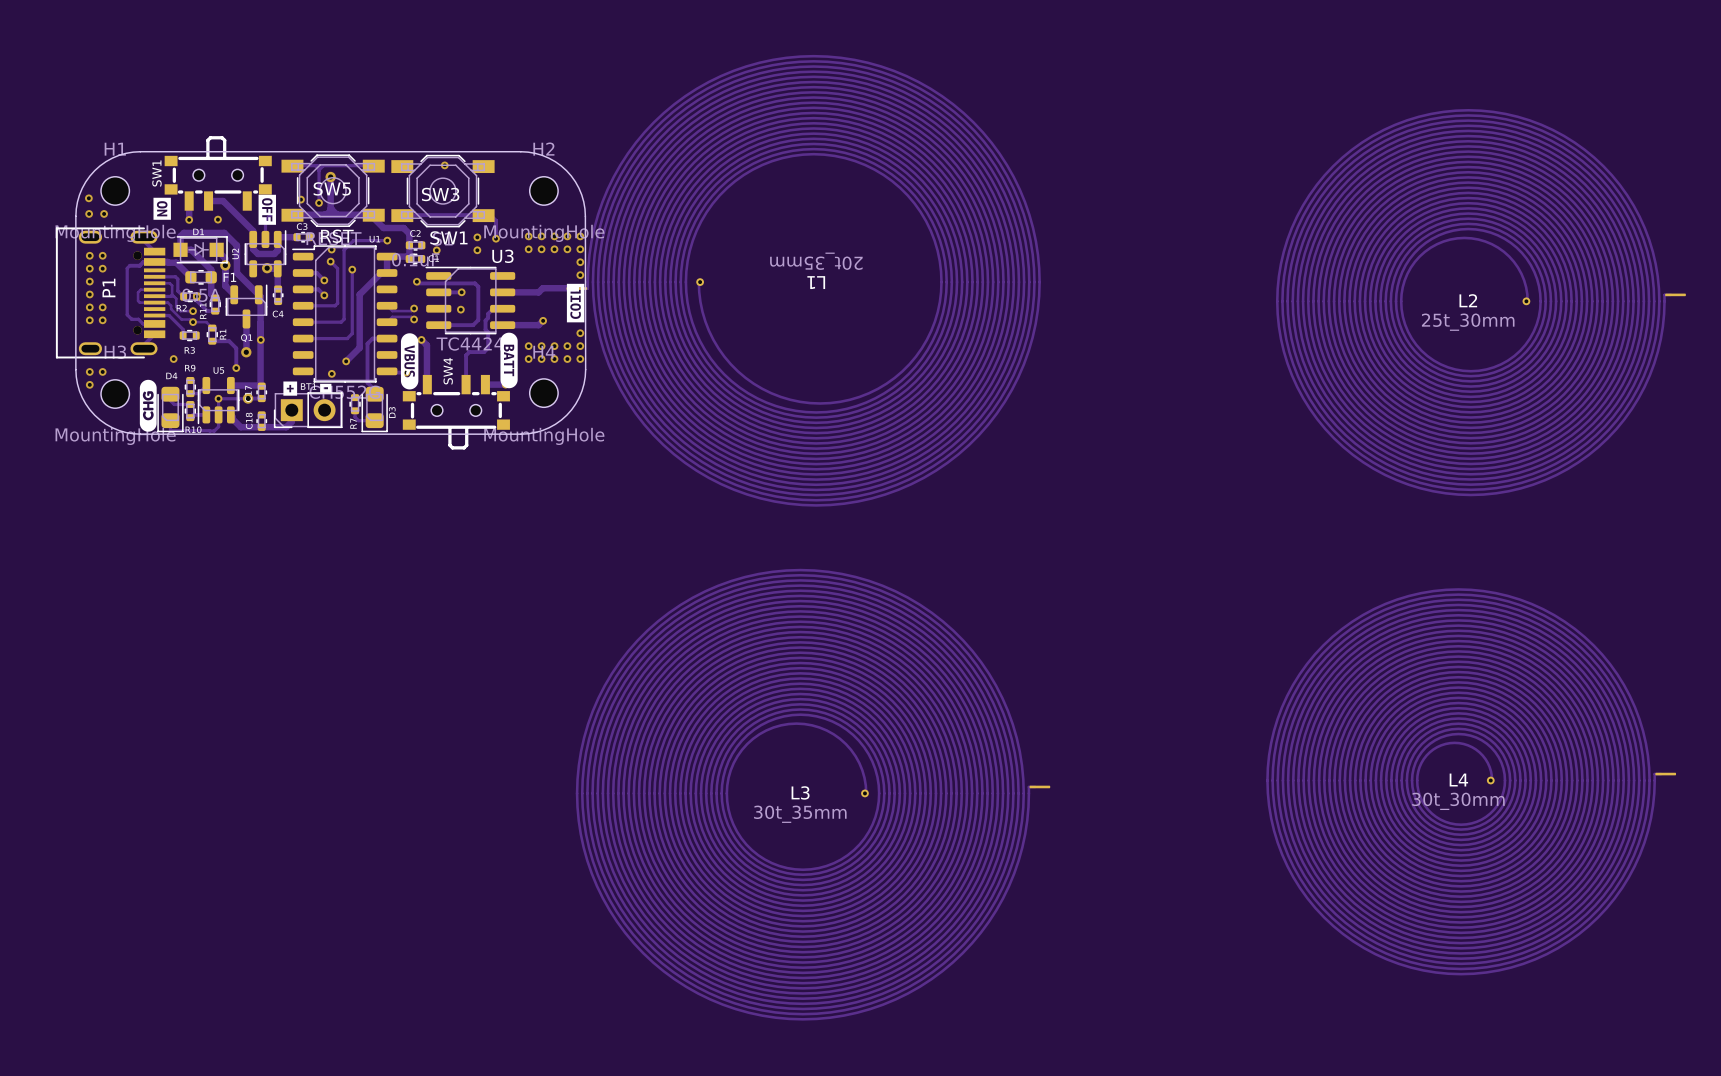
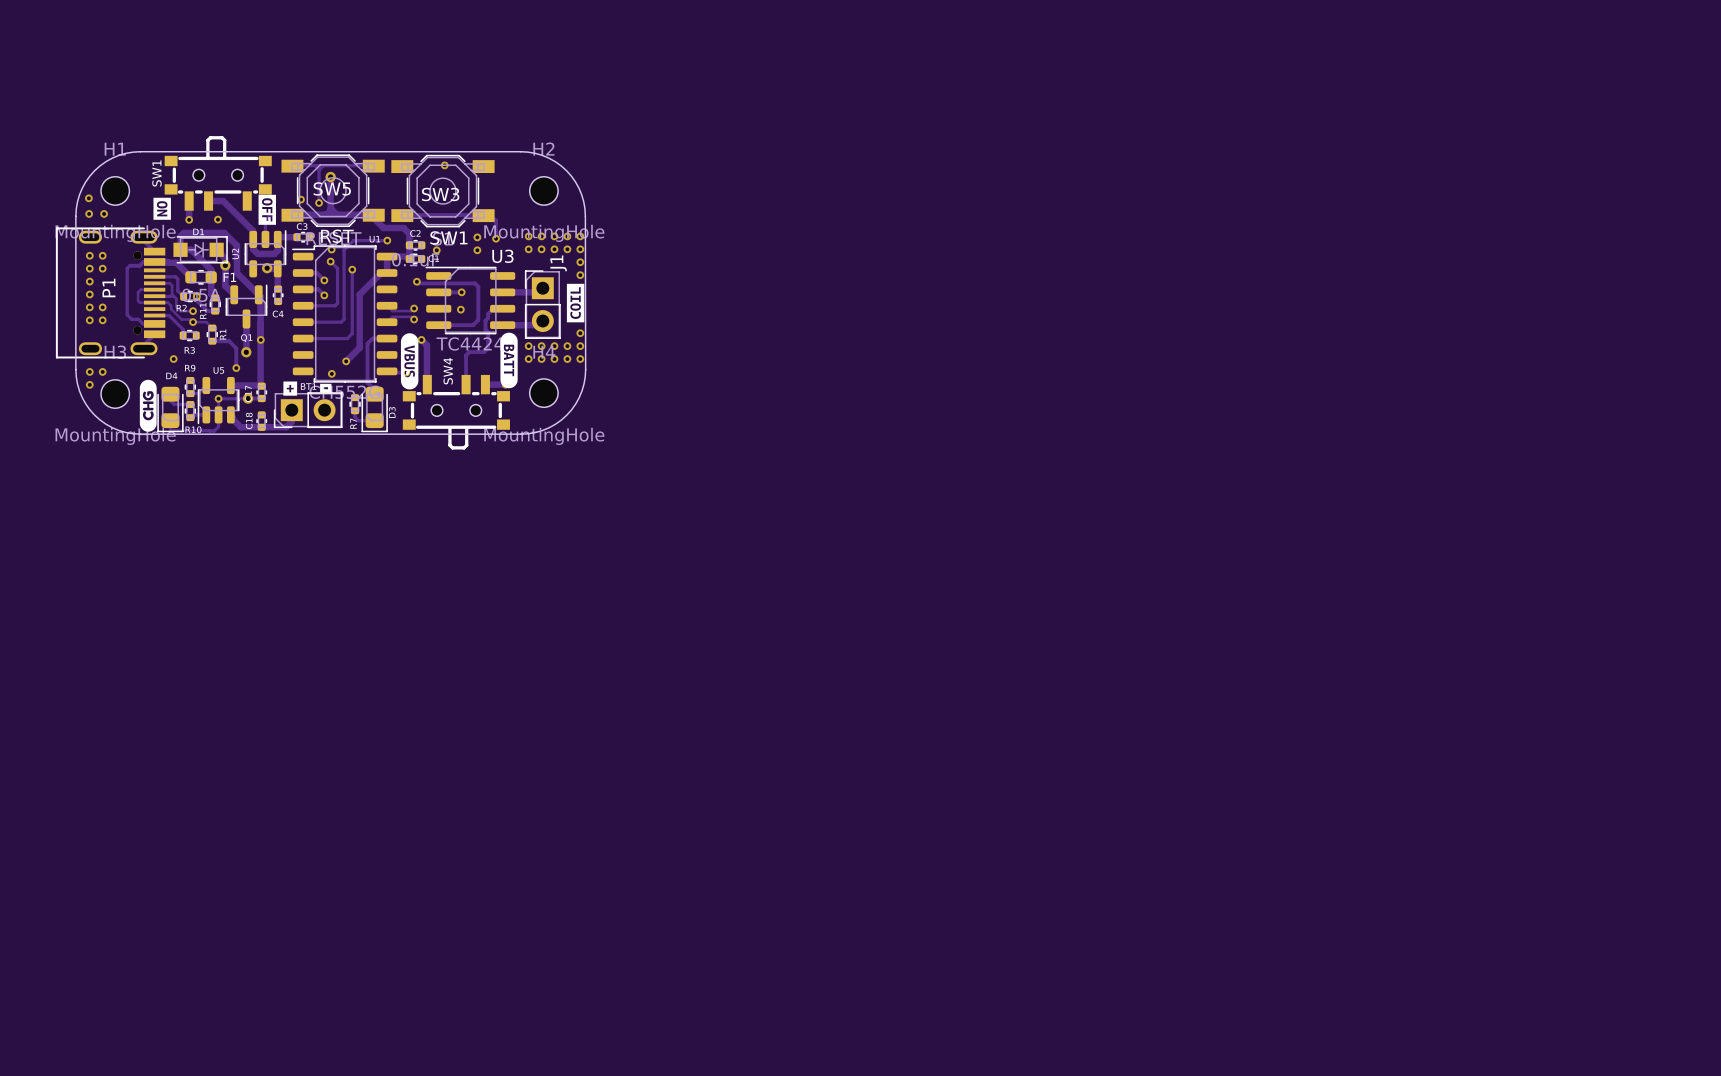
L1: 20t_35mm (803, 280) -> none
track: (542, 288) (574, 288) -> none
L2: 25t_30mm (1480, 302) -> none
J1: none -> (542, 304)
via: (543, 320) -> none
L4: 30t_30mm (1471, 781) -> none
L3: 30t_35mm (813, 794) -> none

